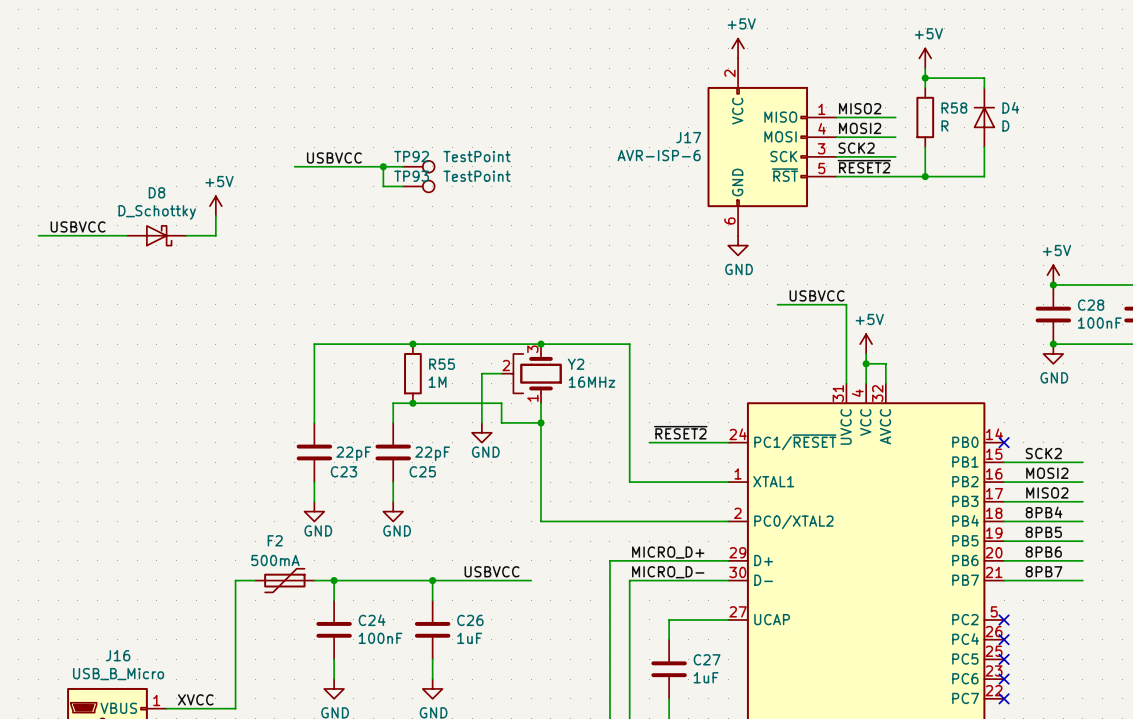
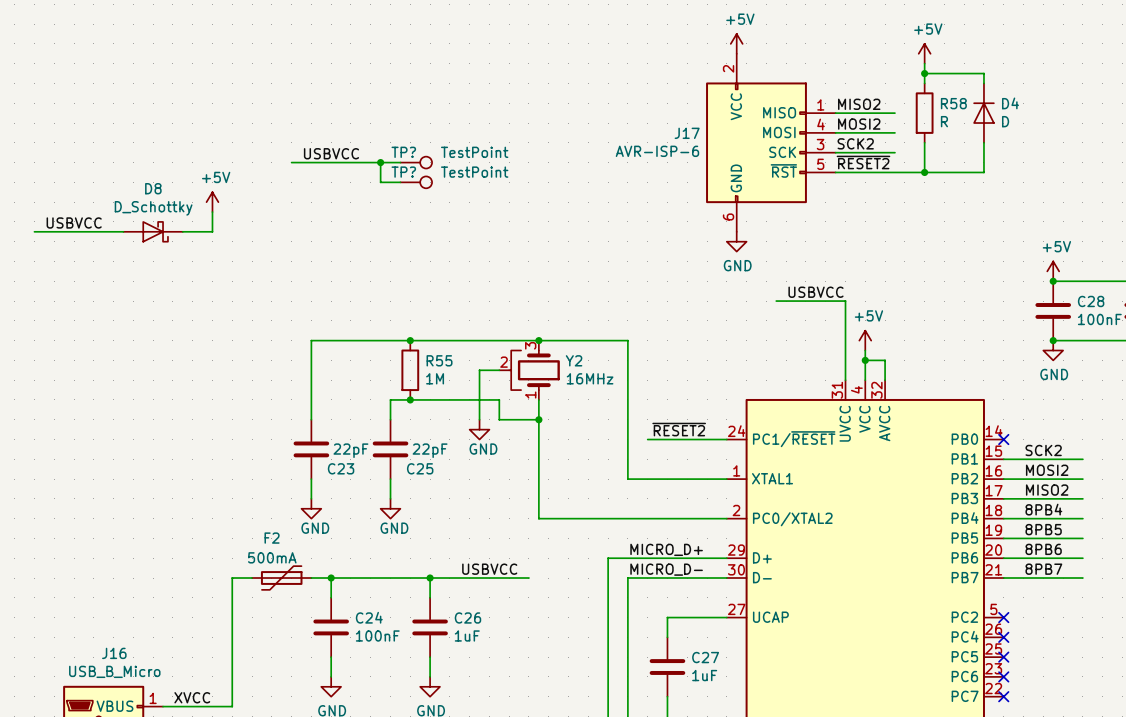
TP92 name: TP92 (411, 156) -> TP? (403, 152)
TP93 name: TP93 (411, 176) -> TP? (403, 172)

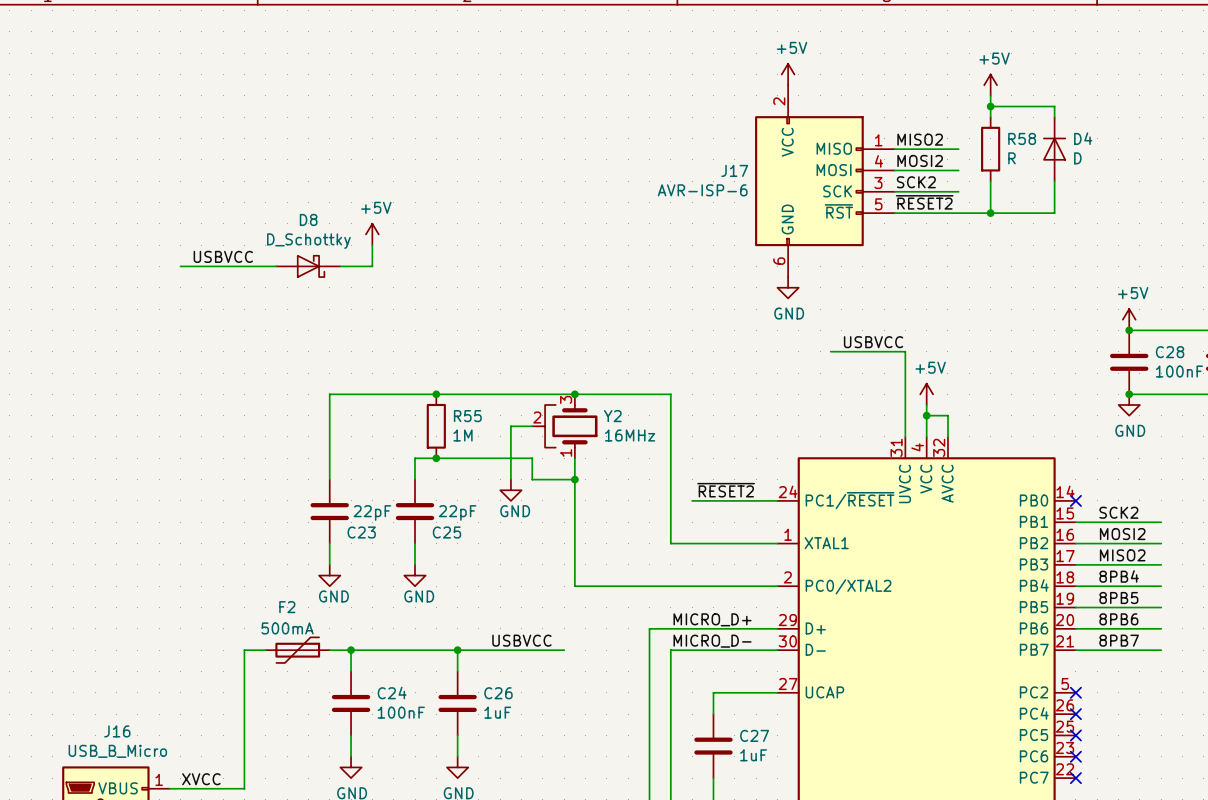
label: USBVCC (331, 153) -> none
wire: (291, 162) (400, 162) -> none
wire: (380, 162) (380, 182) (400, 182) -> none
junction: (380, 162) -> none
TP?: TestPoint (416, 162) -> none
TP?: TestPoint (416, 182) -> none
power symbol position: +5V (212, 202) -> +5V (372, 234)
wire: (212, 212) (212, 231) (182, 231) -> (372, 245) (372, 266) (340, 266)
label: none -> USBVCC (223, 256)
label: USBVCC (74, 222) -> none
wire: (34, 231) (123, 231) -> (180, 266) (276, 266)
D8 position: (153, 231) -> (308, 266)

